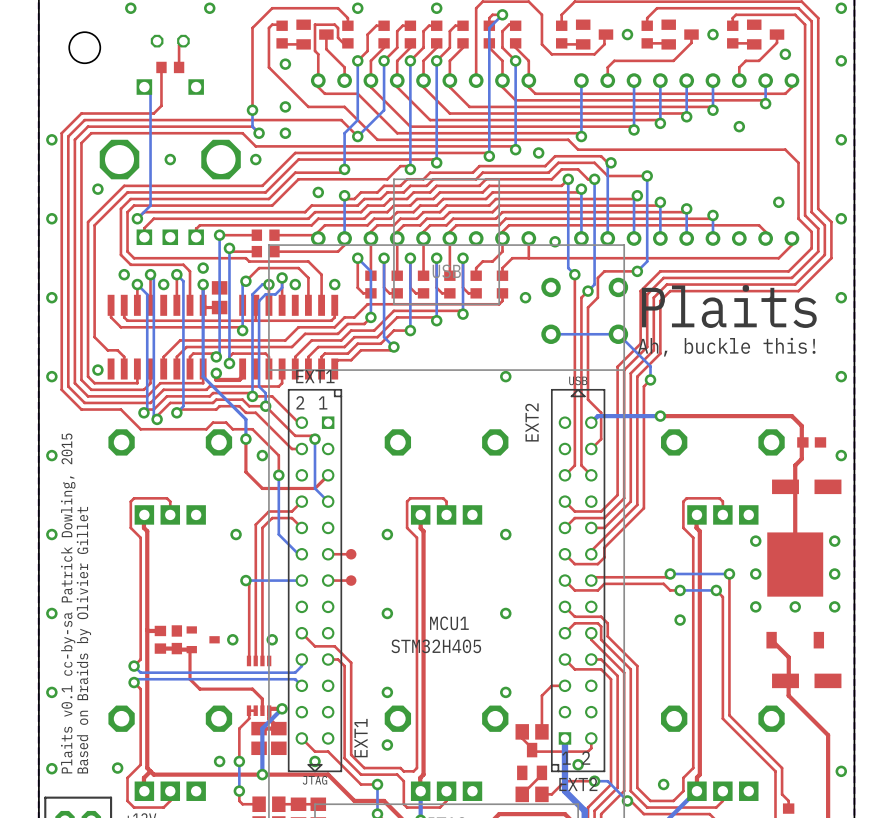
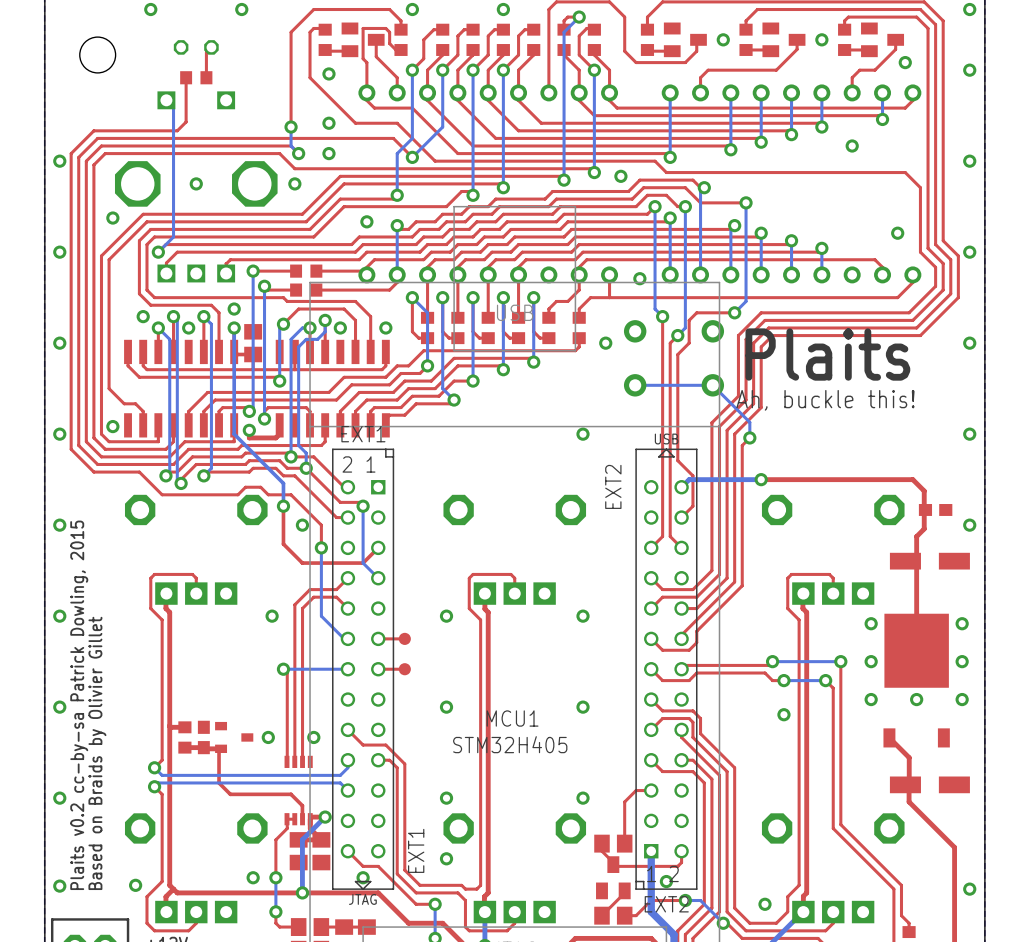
text: Plaits v0.1 cc-by-sa Patrick Dowling, 2015 (68, 603) -> Plaits v0.2 cc-by-sa Patrick Dowling, 2015 (79, 705)

